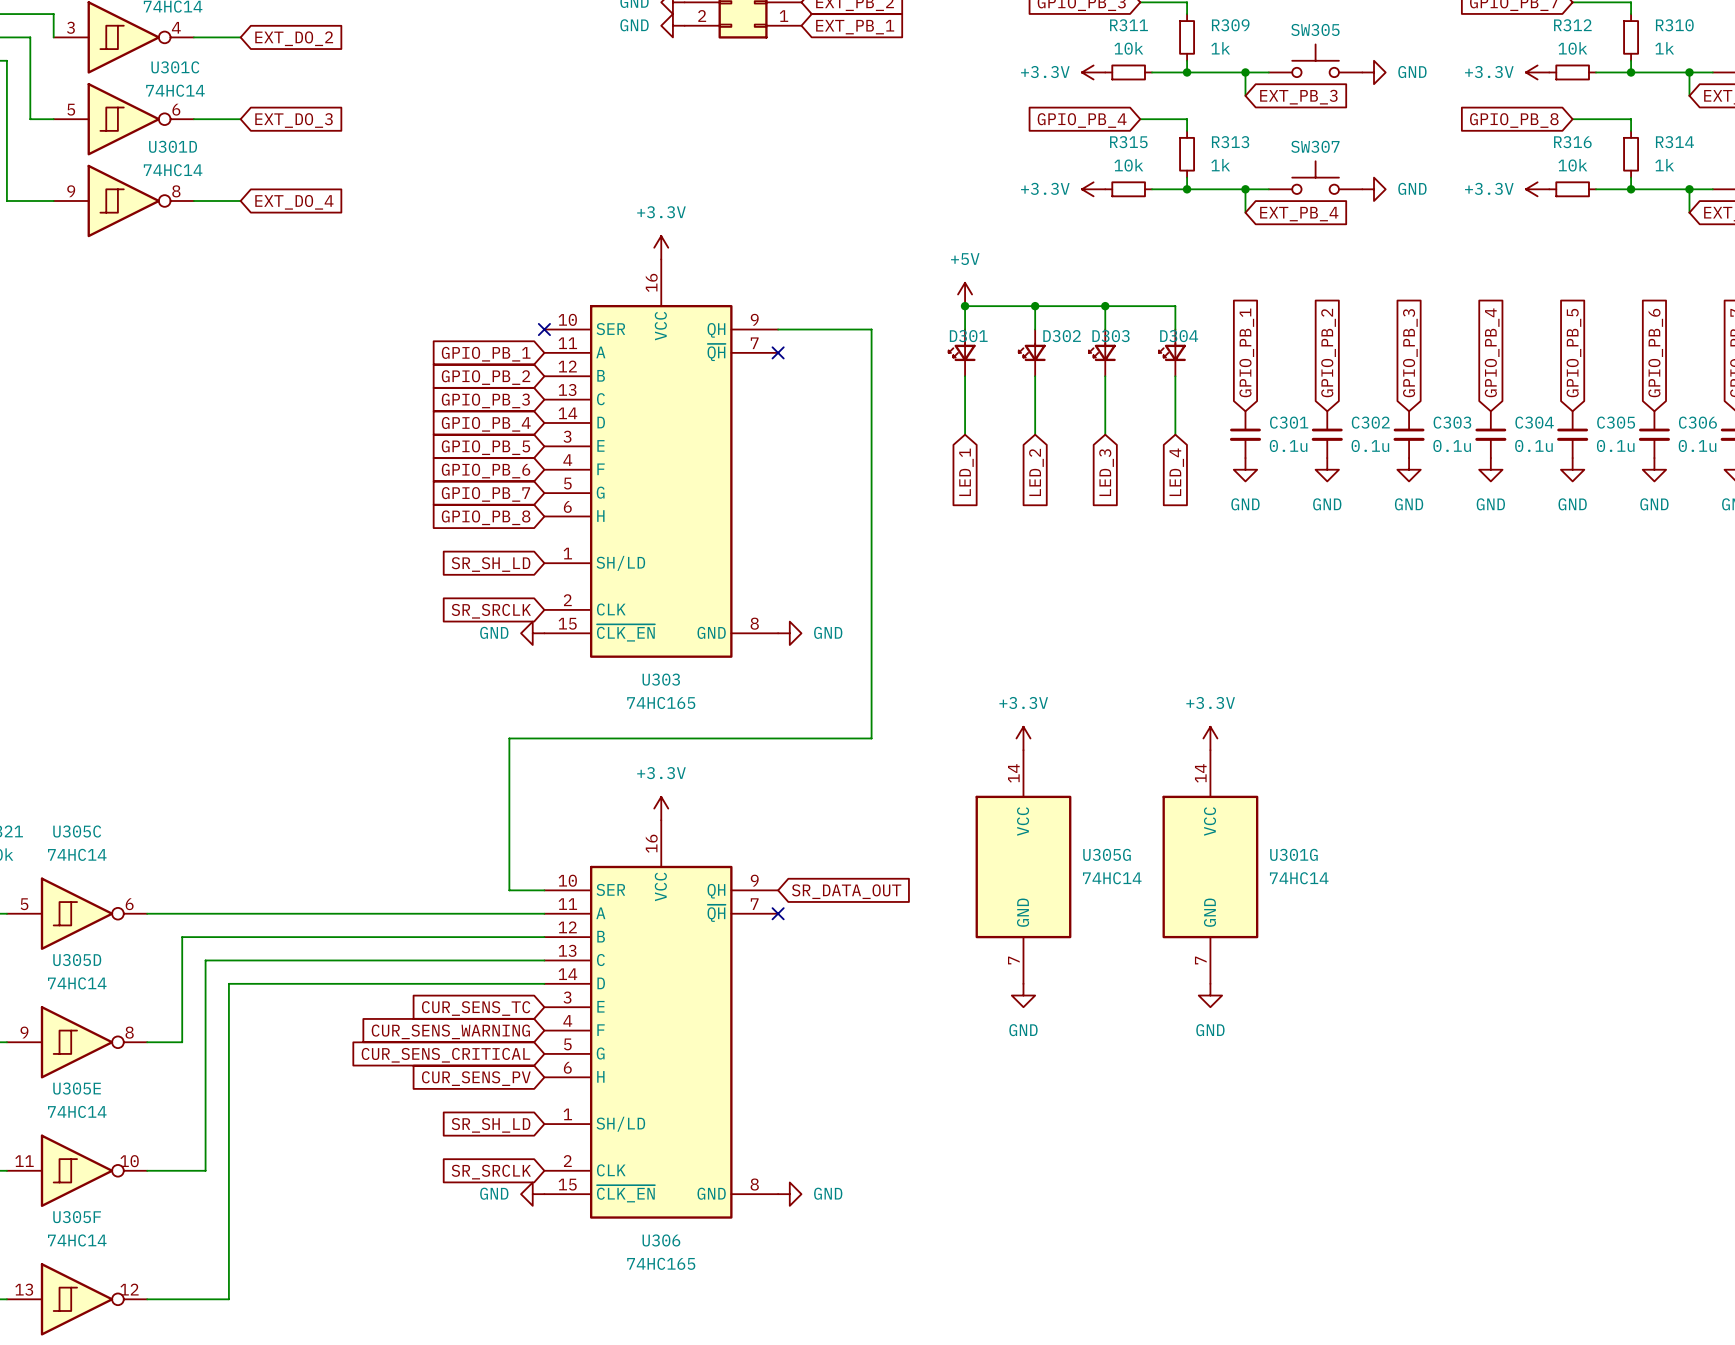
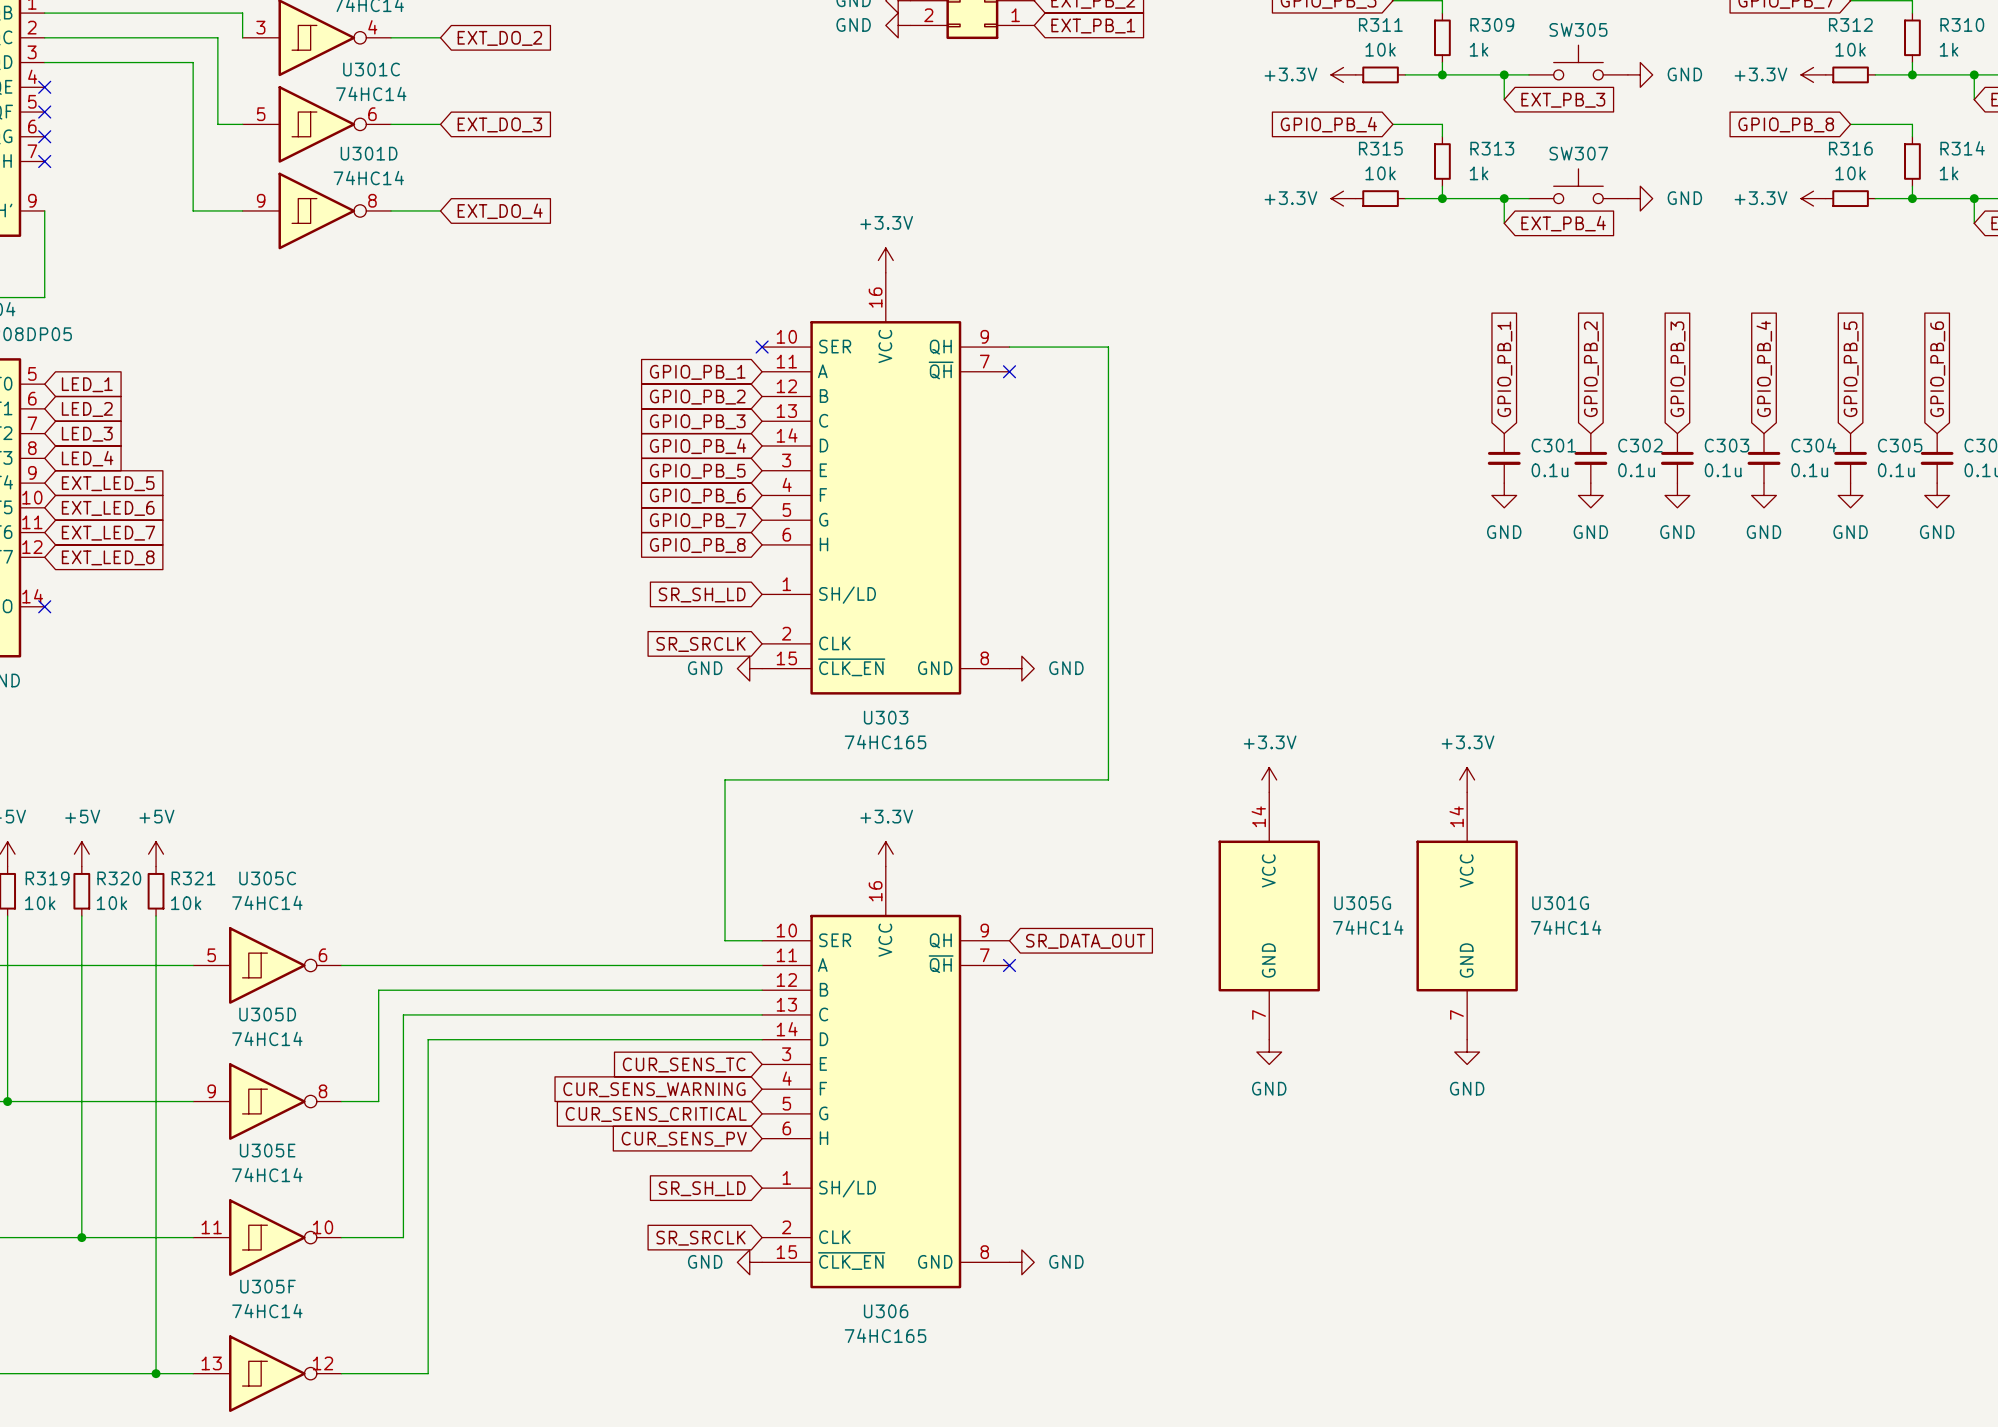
power symbol: +5V (965, 294) -> none
junction: (965, 306) -> none
wire: (1035, 306) (1035, 329) -> none
junction: (1035, 306) -> none
wire: (1105, 306) (1105, 329) -> none
junction: (1105, 306) -> none
wire: (965, 329) (965, 306) (1175, 306) (1175, 329) -> none
D301: (962, 352) -> none
D302: (1032, 352) -> none
D303: (1102, 352) -> none
D304: (1172, 352) -> none
wire: (965, 376) (965, 434) -> none
wire: (1035, 376) (1035, 434) -> none
wire: (1105, 376) (1105, 434) -> none
wire: (1175, 376) (1175, 434) -> none
global label: LED_1 (966, 472) -> none
global label: LED_2 (1036, 472) -> none
global label: LED_3 (1106, 472) -> none
global label: LED_4 (1176, 472) -> none

